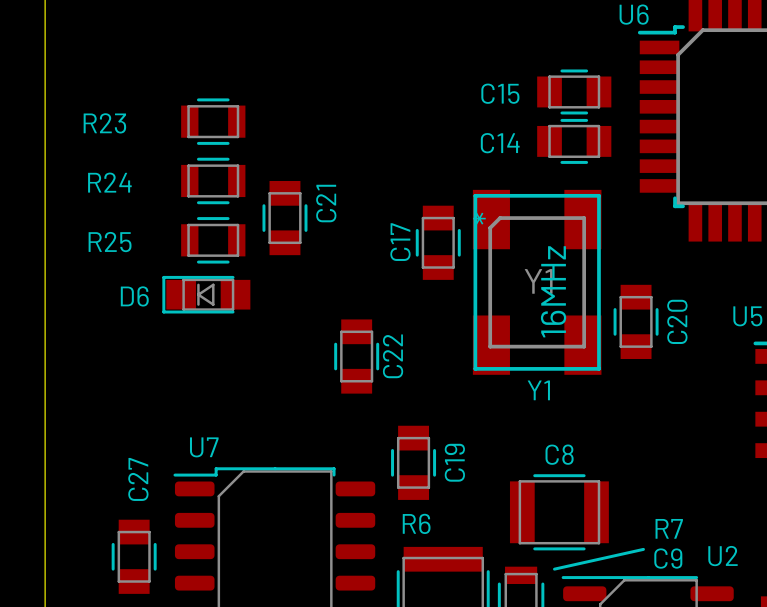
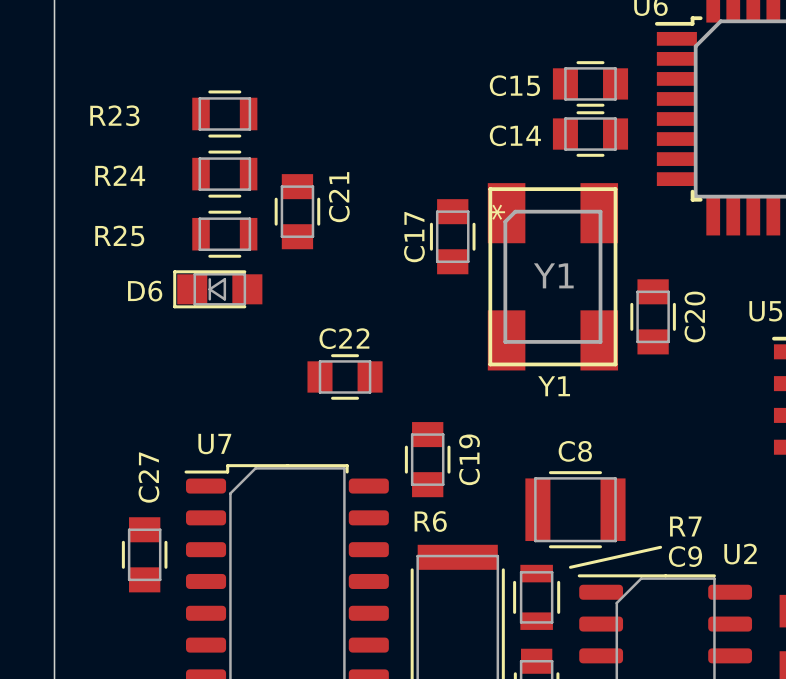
Y1 value: 16MHz (553, 291) -> none
C22 rotation: 0° (356, 356) -> 90° clockwise (345, 376)
C22 name position: C22 (393, 356) -> C22 (344, 338)

